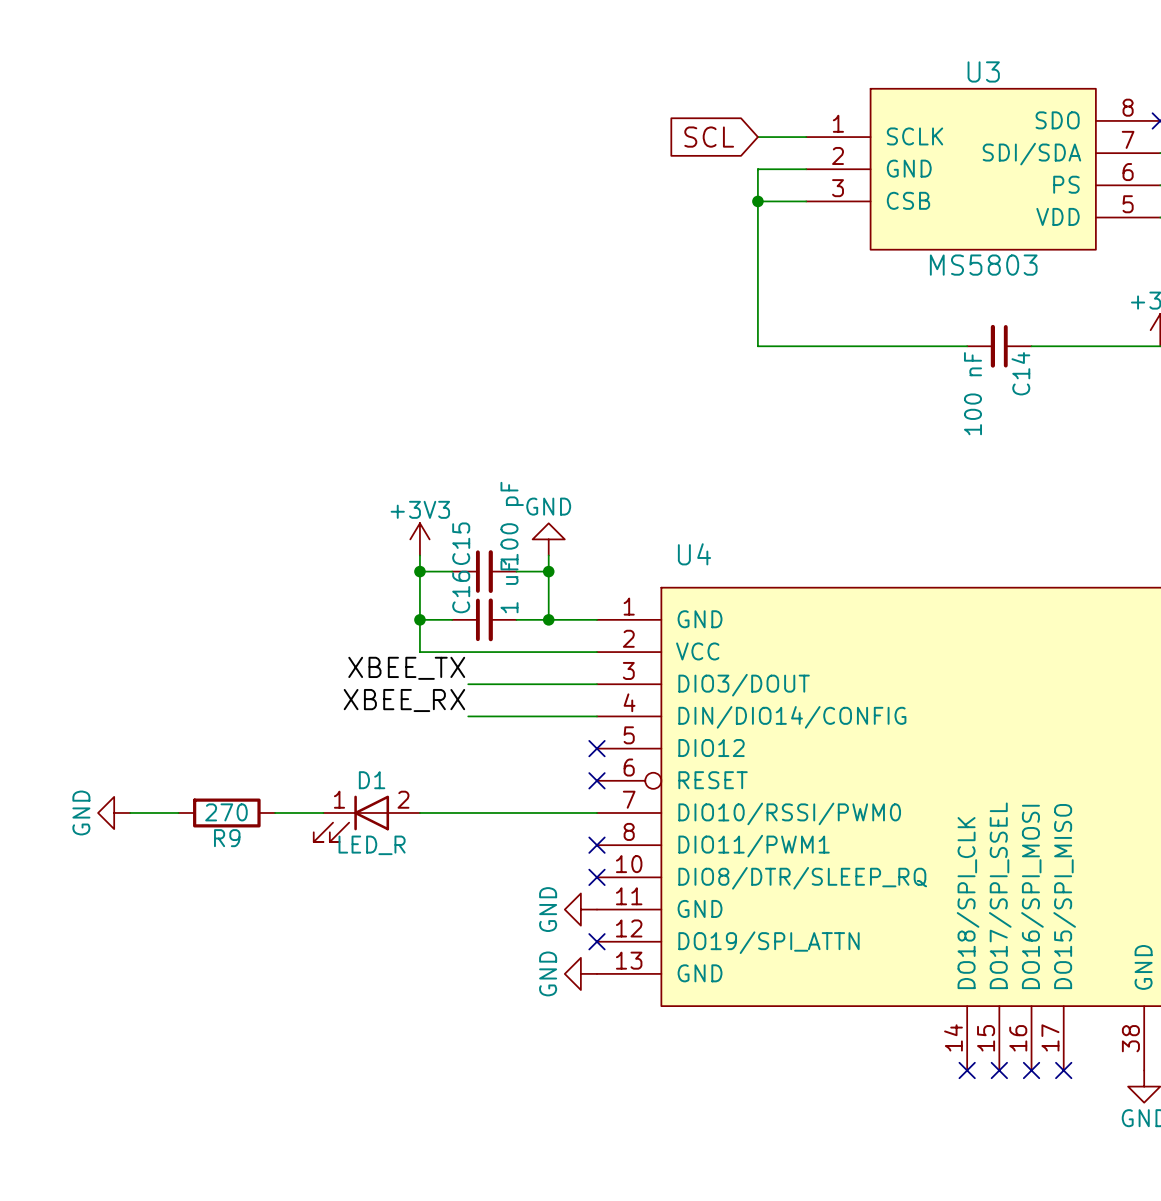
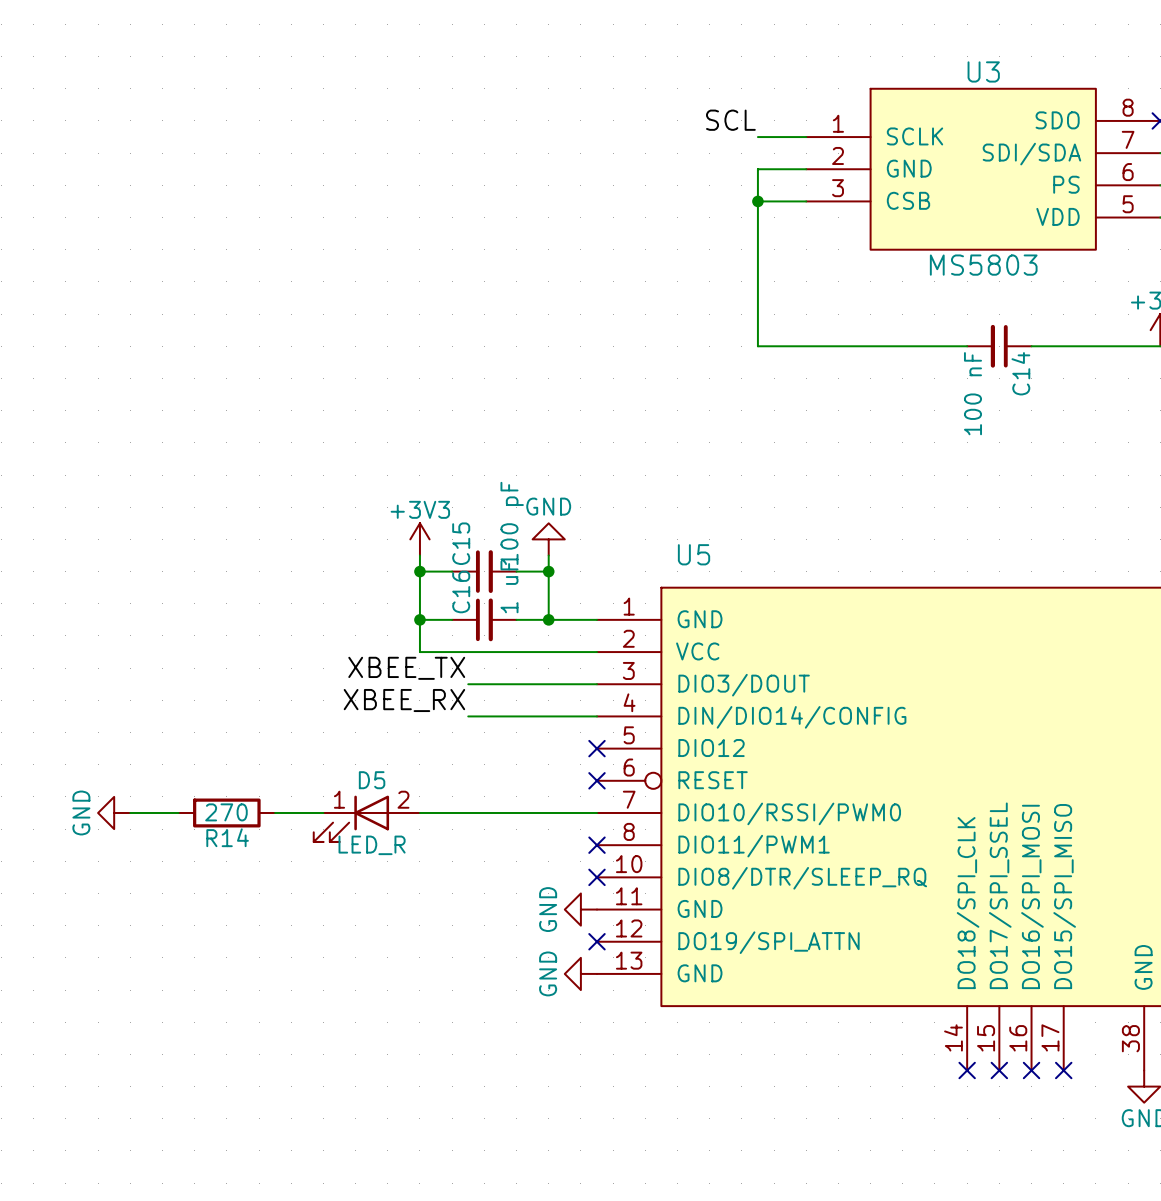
label: none -> SCL (730, 120)
global label: SCL (709, 137) -> none
U4 name: U4 (694, 554) -> U5 (694, 554)
D1 name: D1 (372, 780) -> D5 (372, 780)
R9 name: R9 (227, 838) -> R14 (227, 837)

